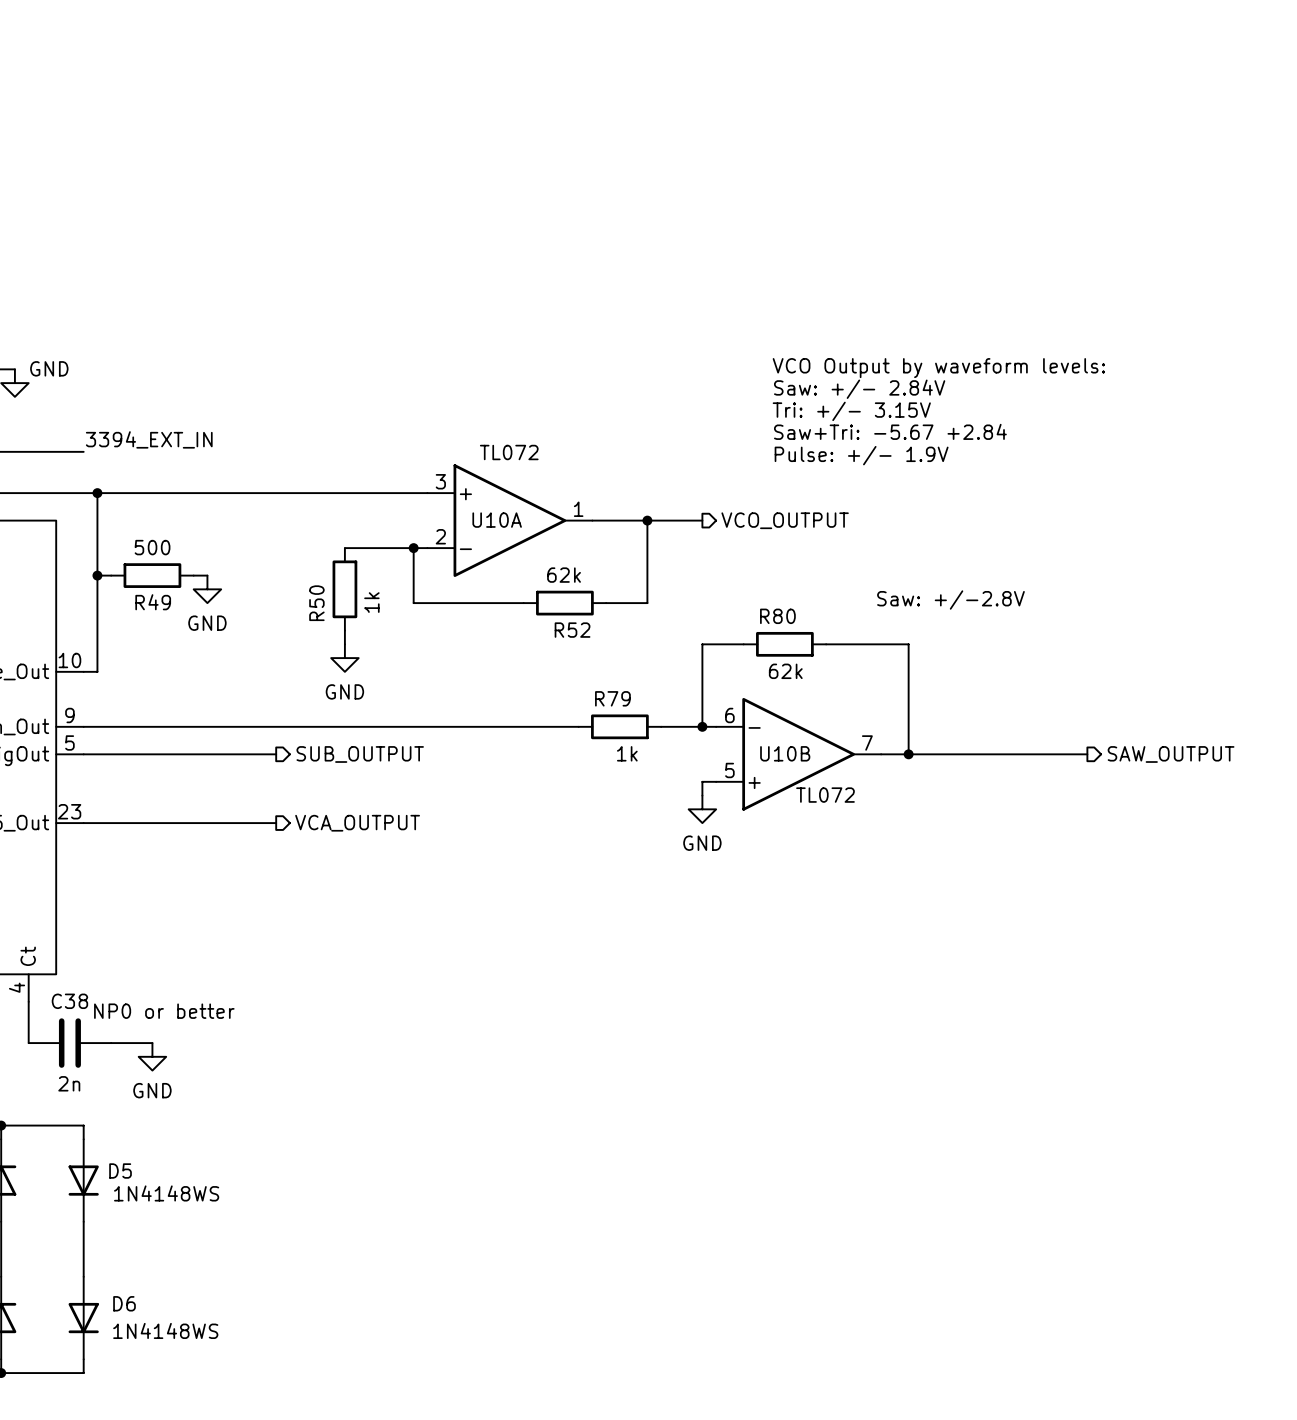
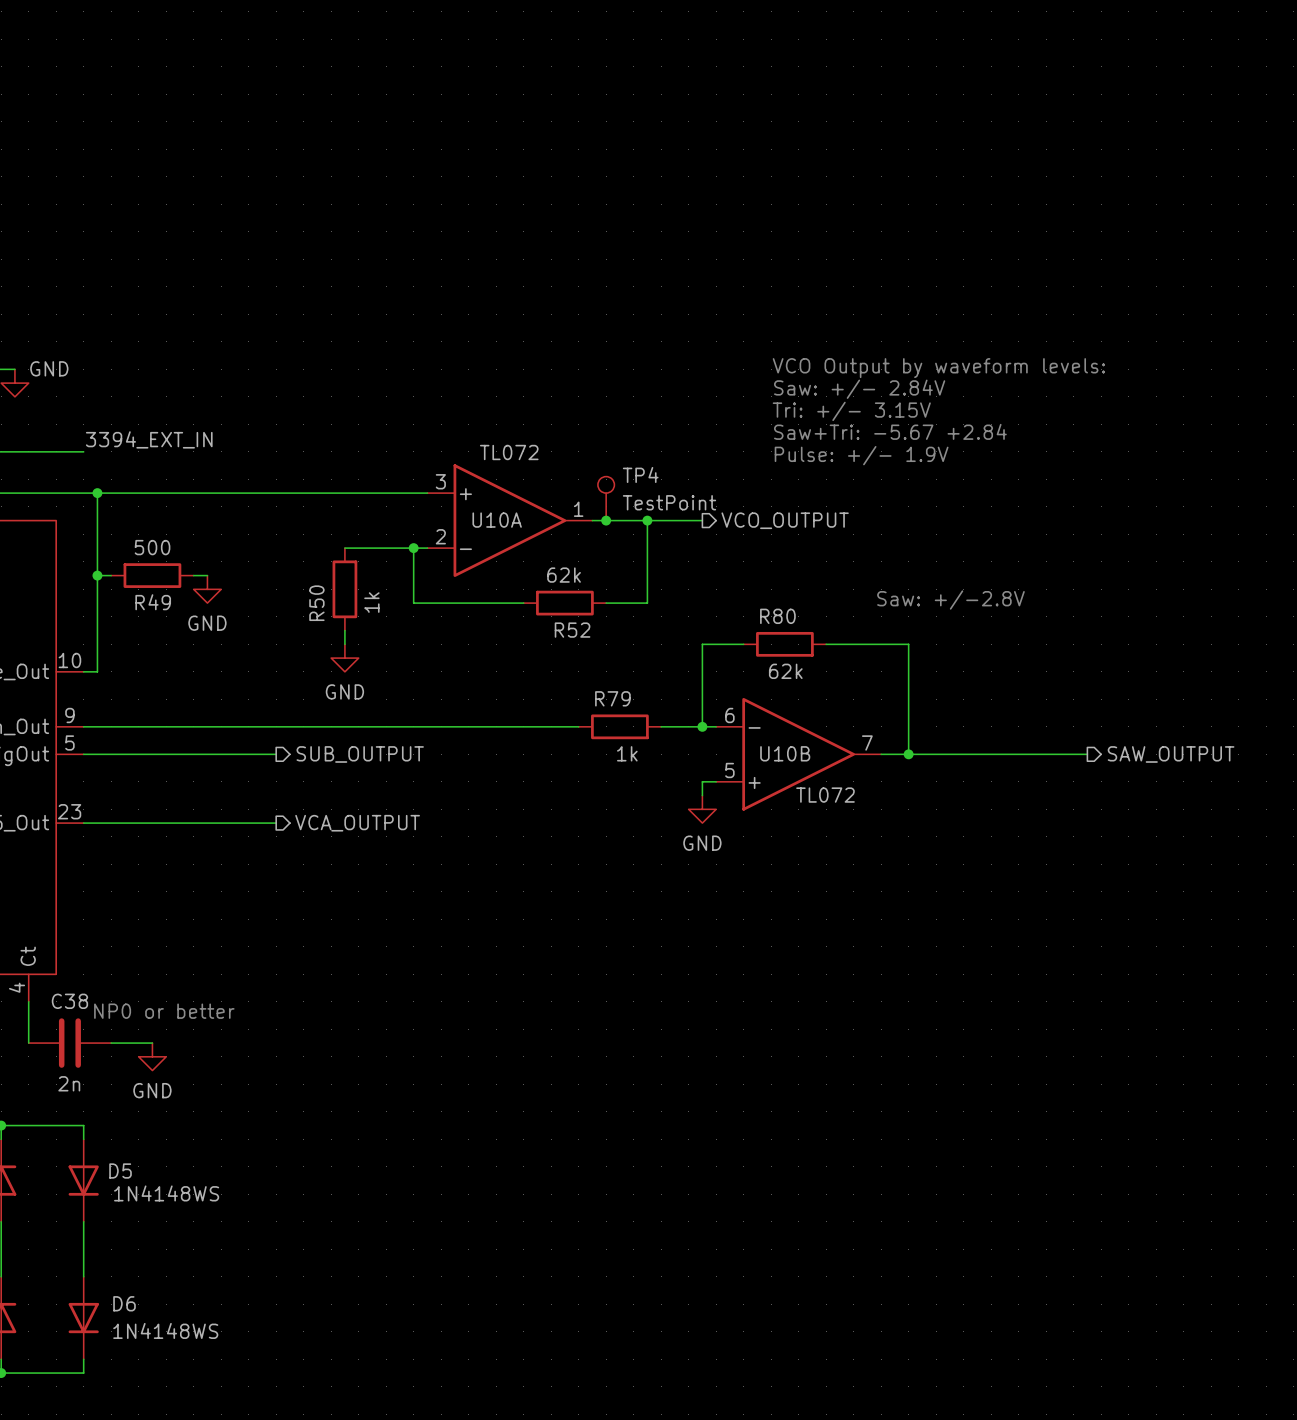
TP4: none -> TestPoint (606, 498)
junction: none -> (606, 520)

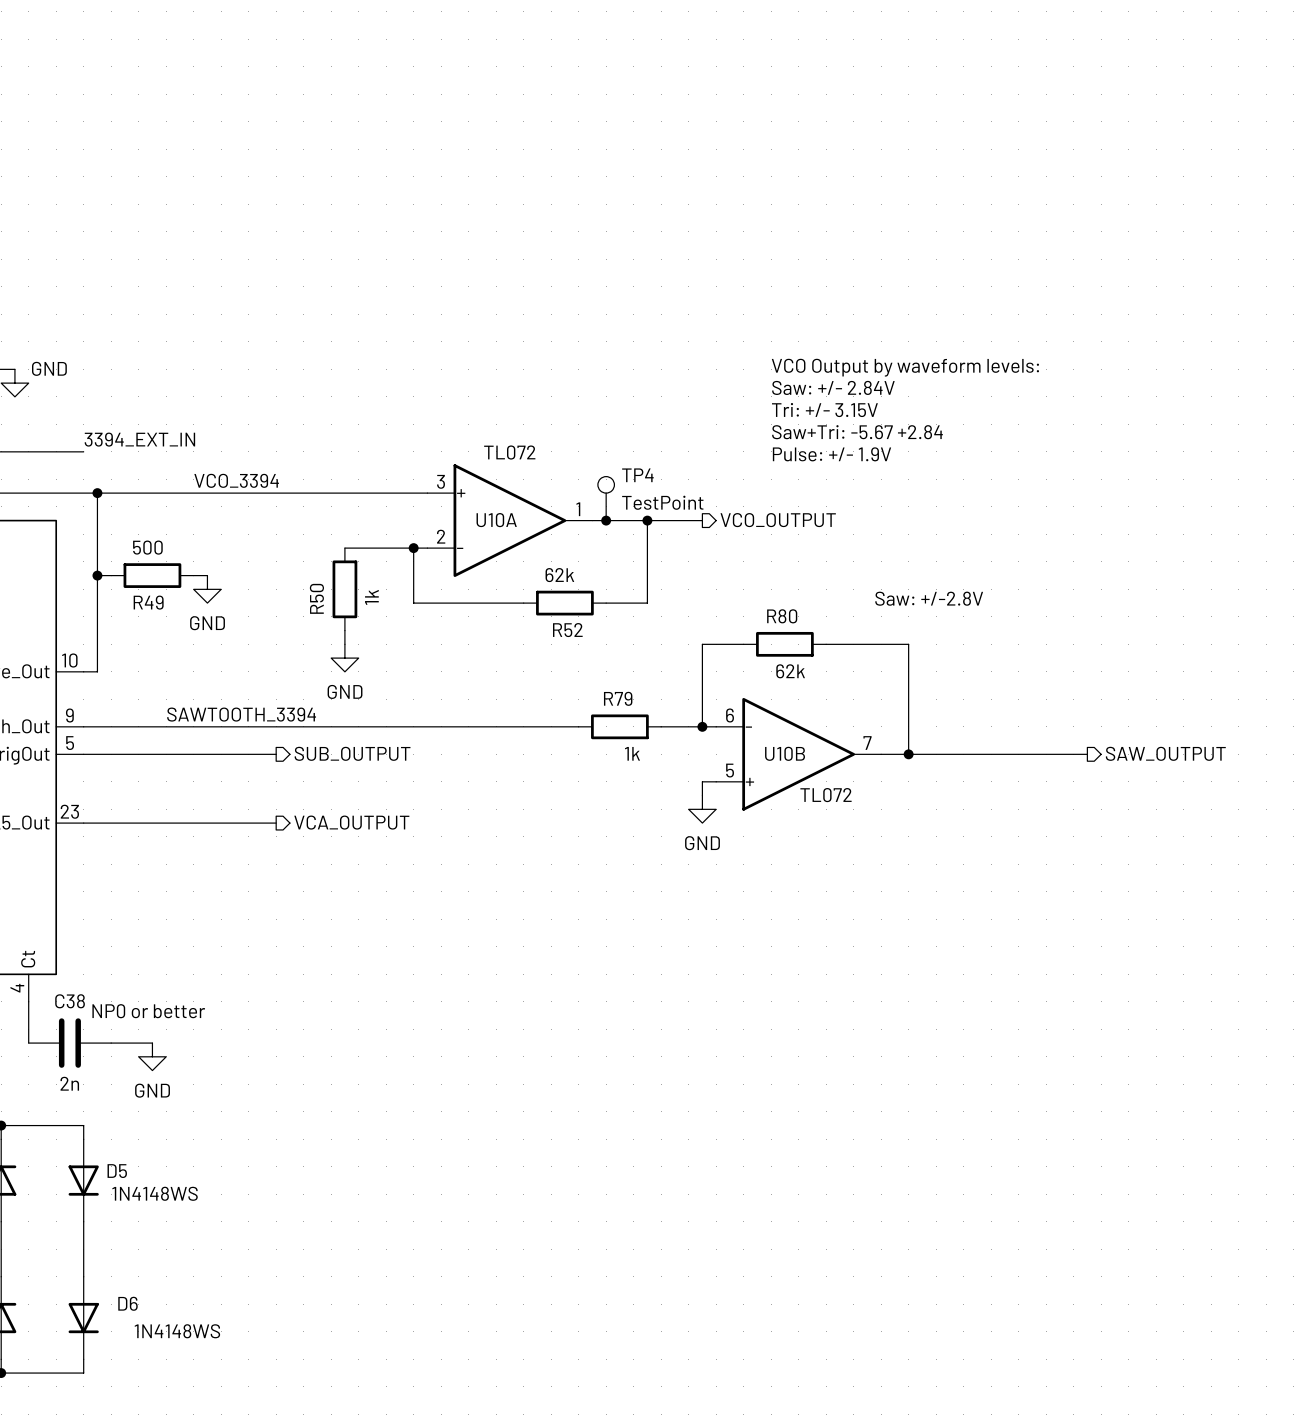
label: none -> VCO_3394 (236, 480)
label: none -> SAWTOOTH_3394 (241, 714)

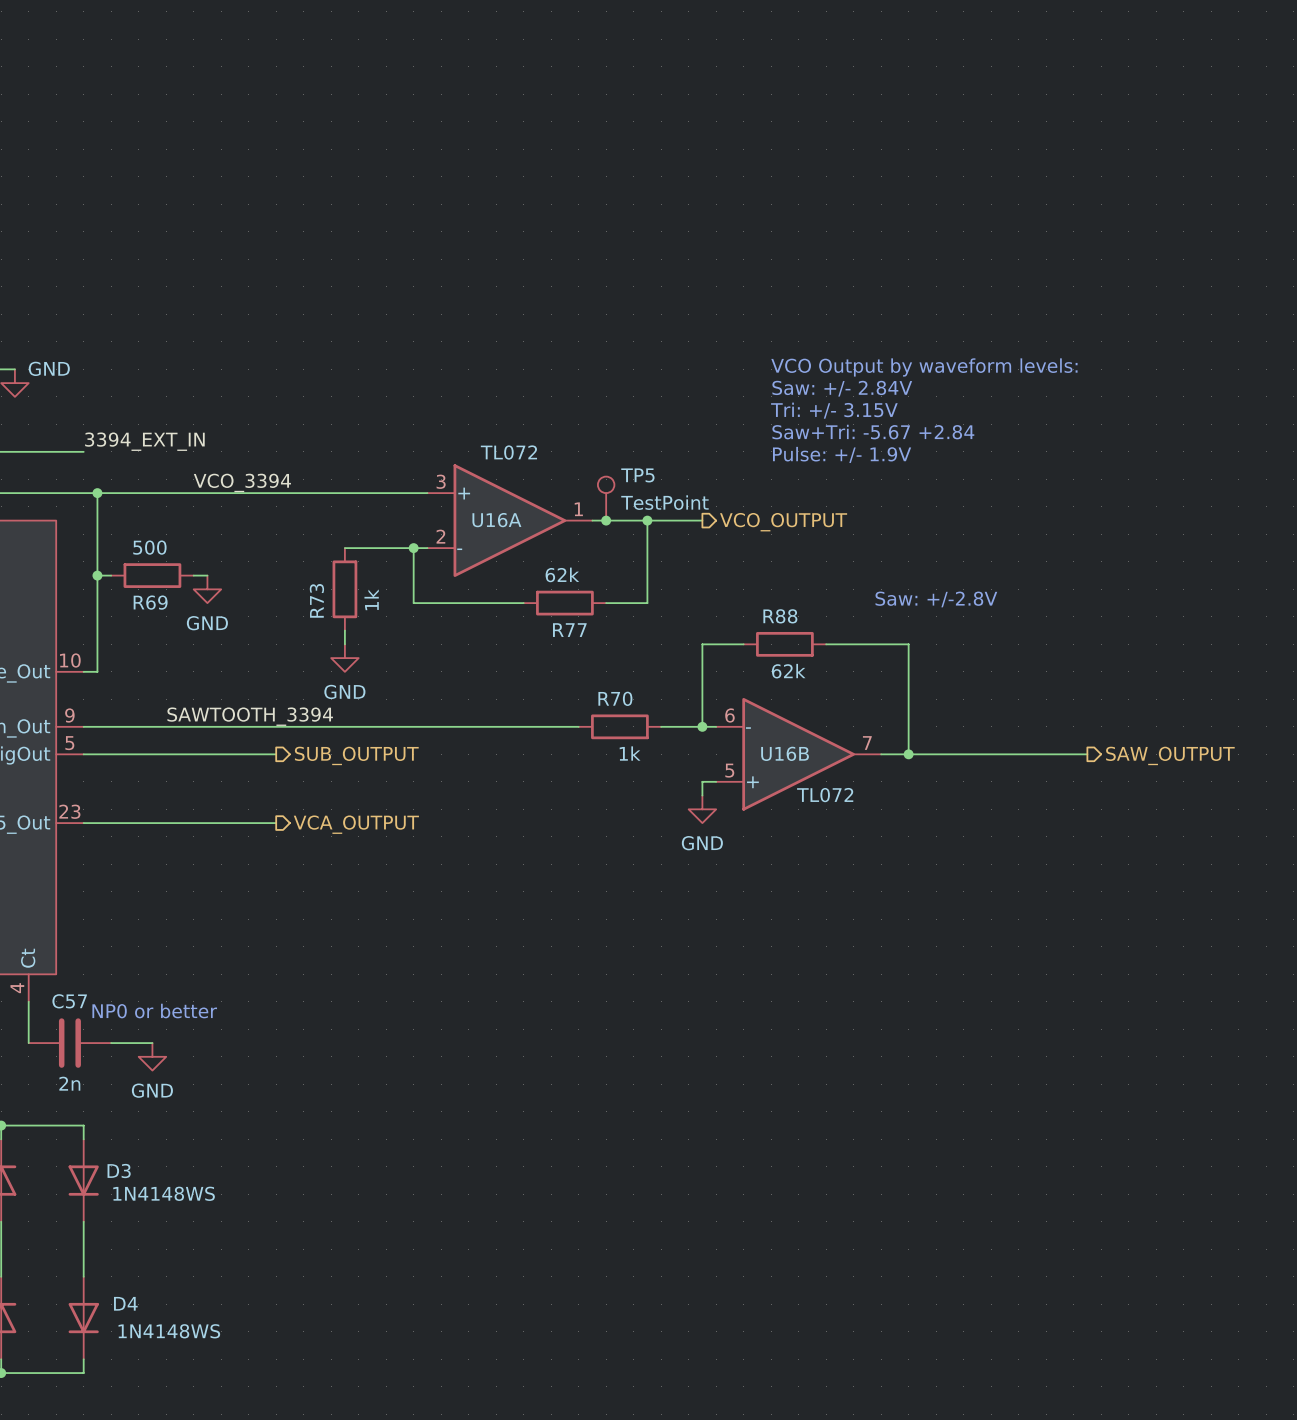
TP4 name: TP4 (637, 475) -> TP5 (637, 475)
U10A name: U10A (496, 520) -> U16A (496, 520)
R50 name: R50 (316, 598) -> R73 (316, 600)
R49 name: R49 (148, 602) -> R69 (150, 602)
R80 name: R80 (782, 616) -> R88 (780, 616)
R52 name: R52 (567, 630) -> R77 (569, 630)
R79 name: R79 (618, 698) -> R70 (615, 698)
U10B name: U10B (785, 753) -> U16B (785, 753)
C38 name: C38 (70, 1001) -> C57 (69, 1001)
D5 name: D5 (117, 1171) -> D3 (119, 1171)
D6 name: D6 (127, 1303) -> D4 (125, 1303)

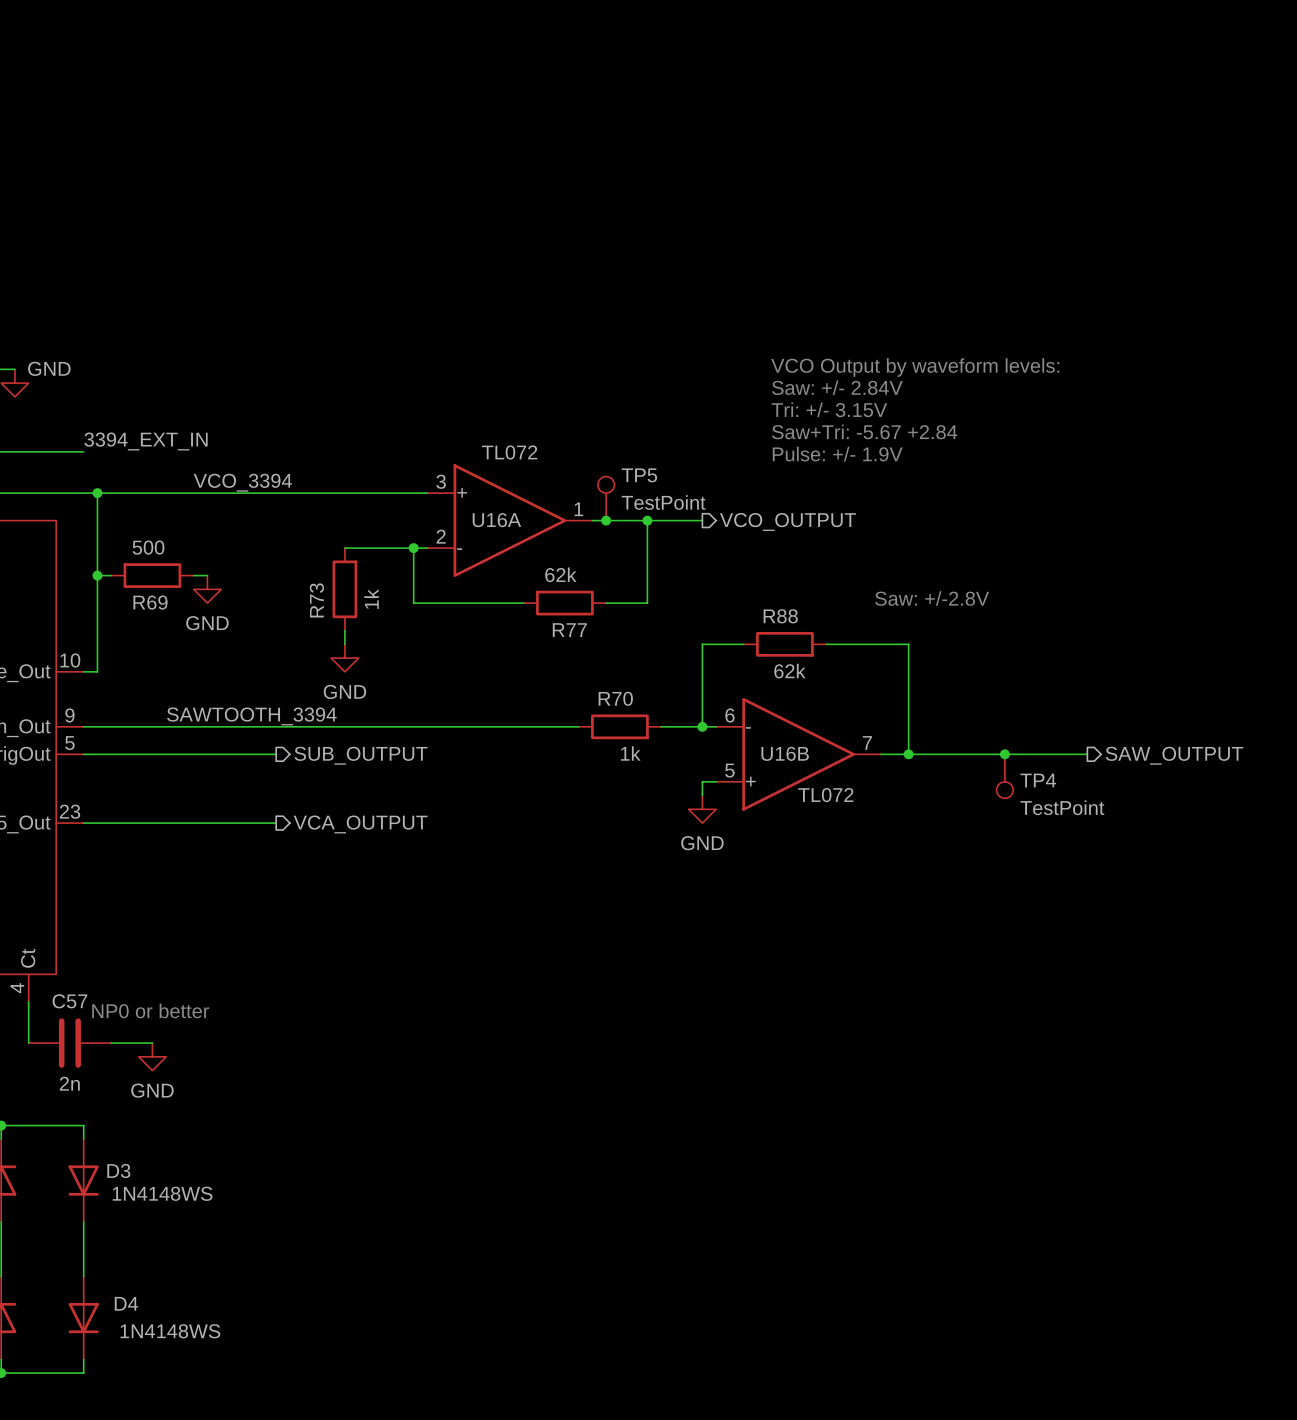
junction: none -> (1004, 754)
TP4: none -> TestPoint (1004, 776)

